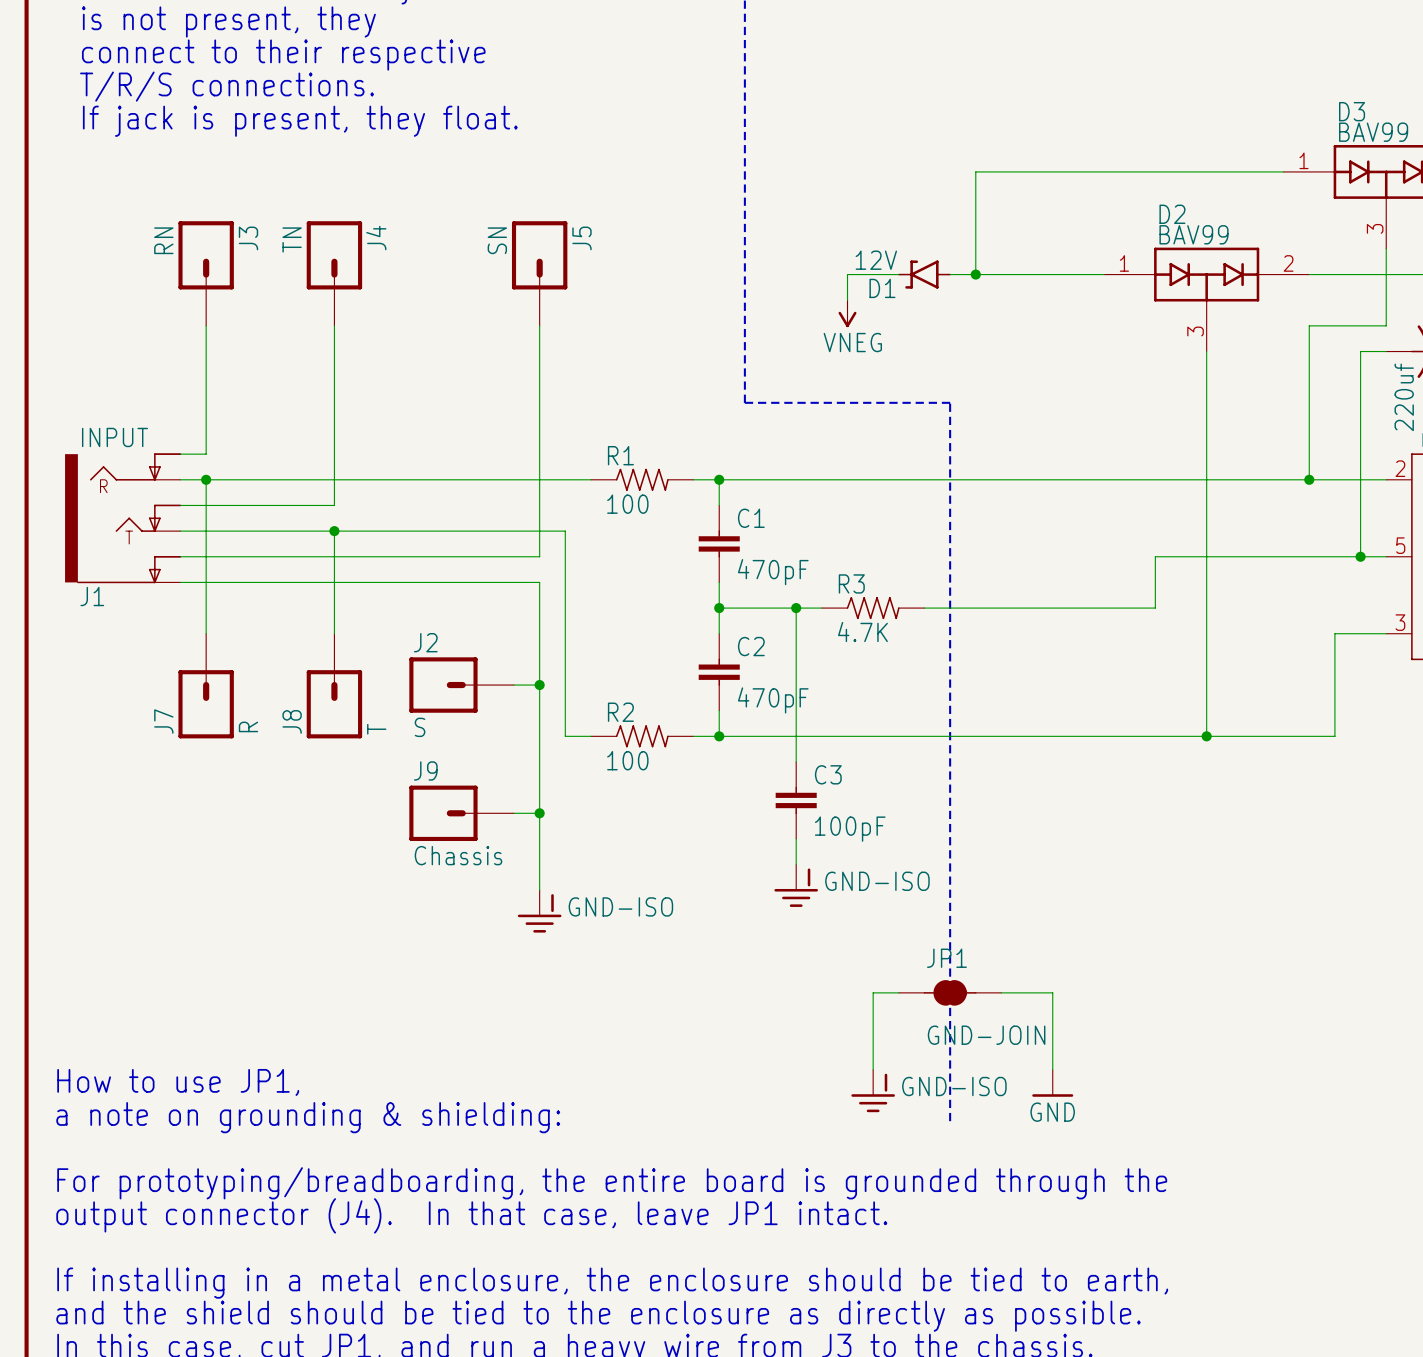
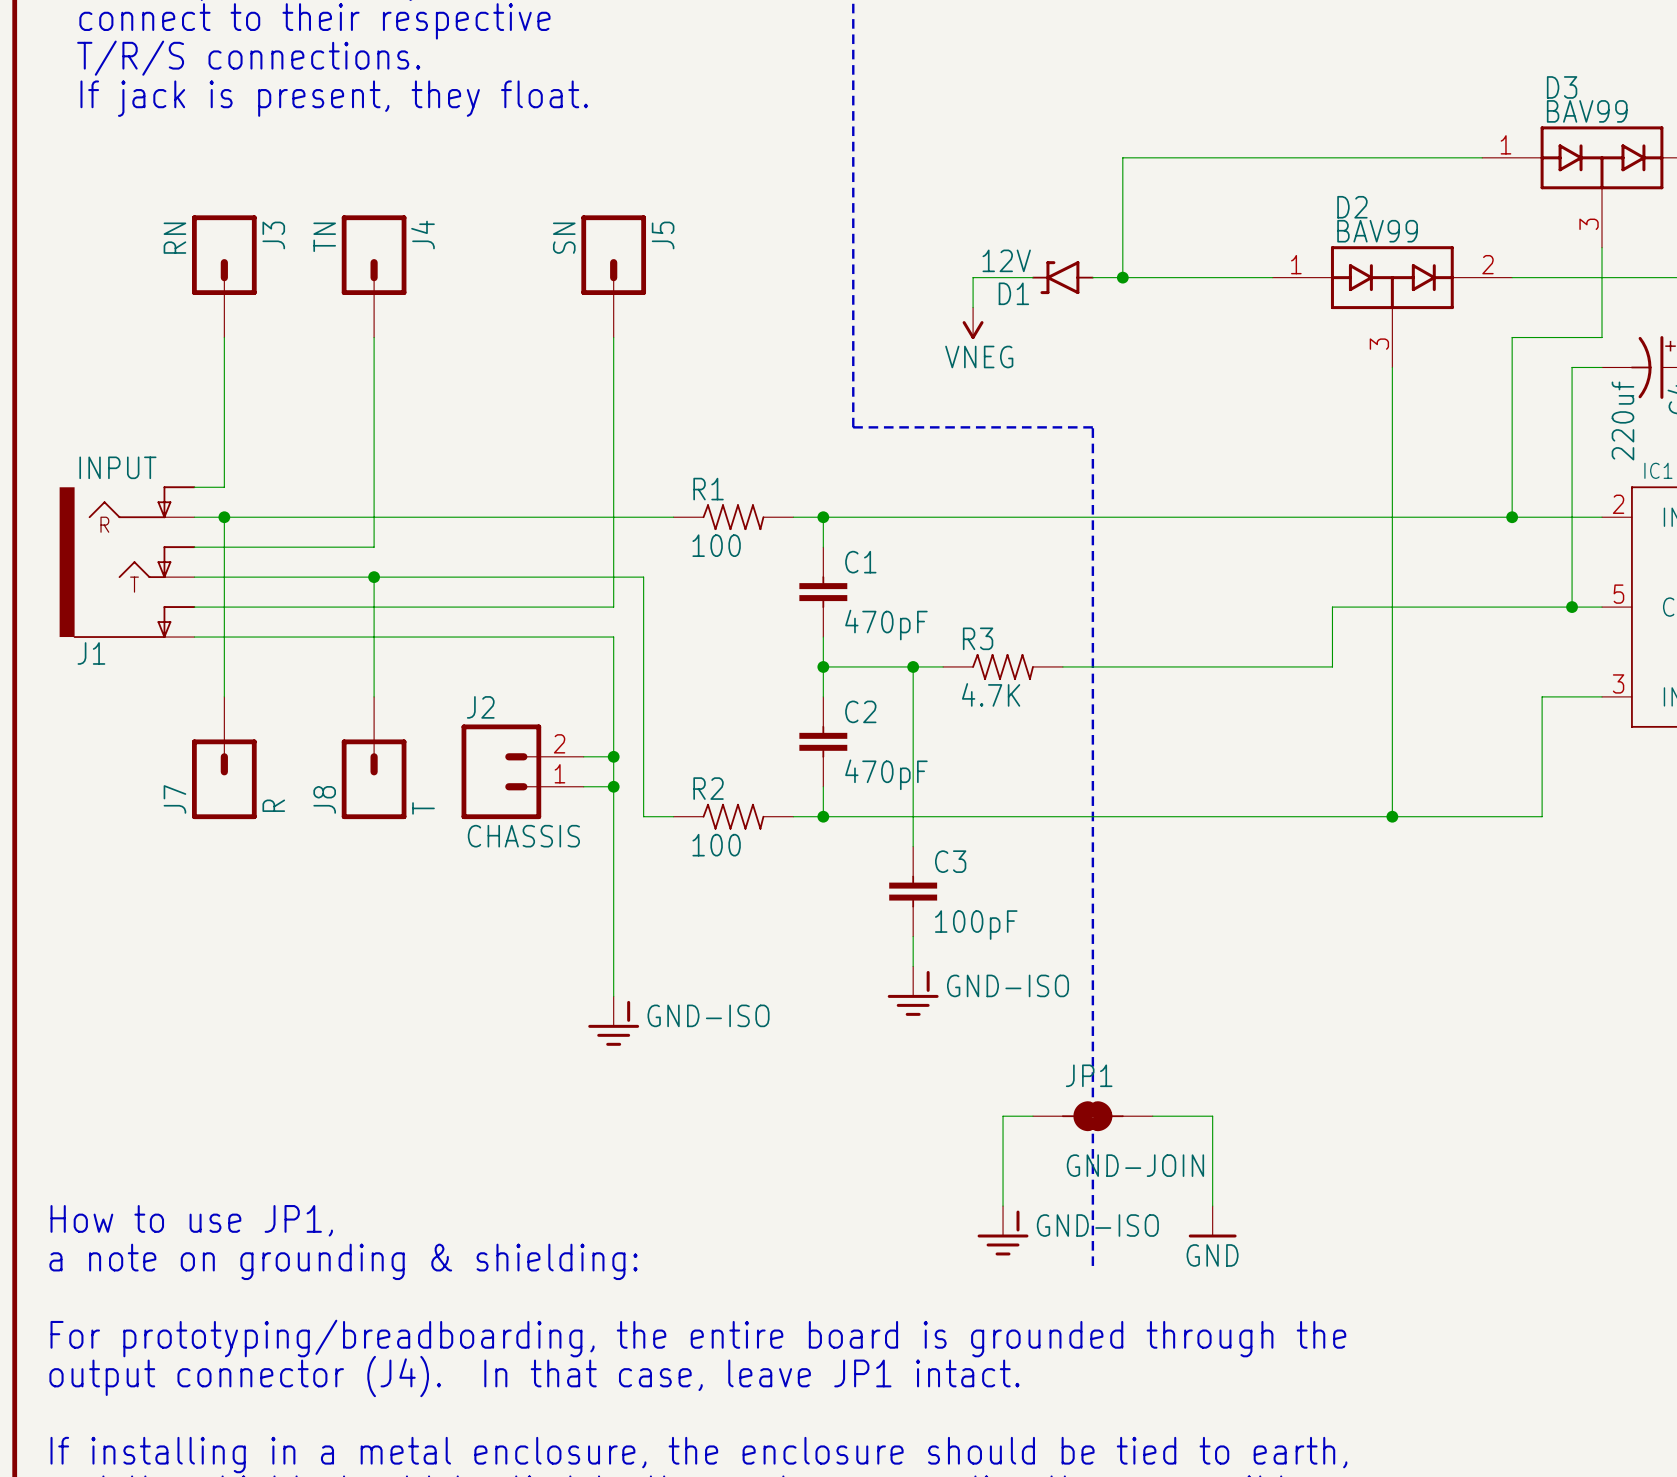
J2 symbol: [409, 657, 515, 713] -> [461, 724, 584, 820]
junction: none -> (613, 786)
J2 value: S (420, 727) -> CHASSIS (523, 836)
J9: Chassis (461, 813) -> none
wire: (514, 813) (539, 813) -> (583, 786) (613, 786)
junction: (539, 813) -> none

